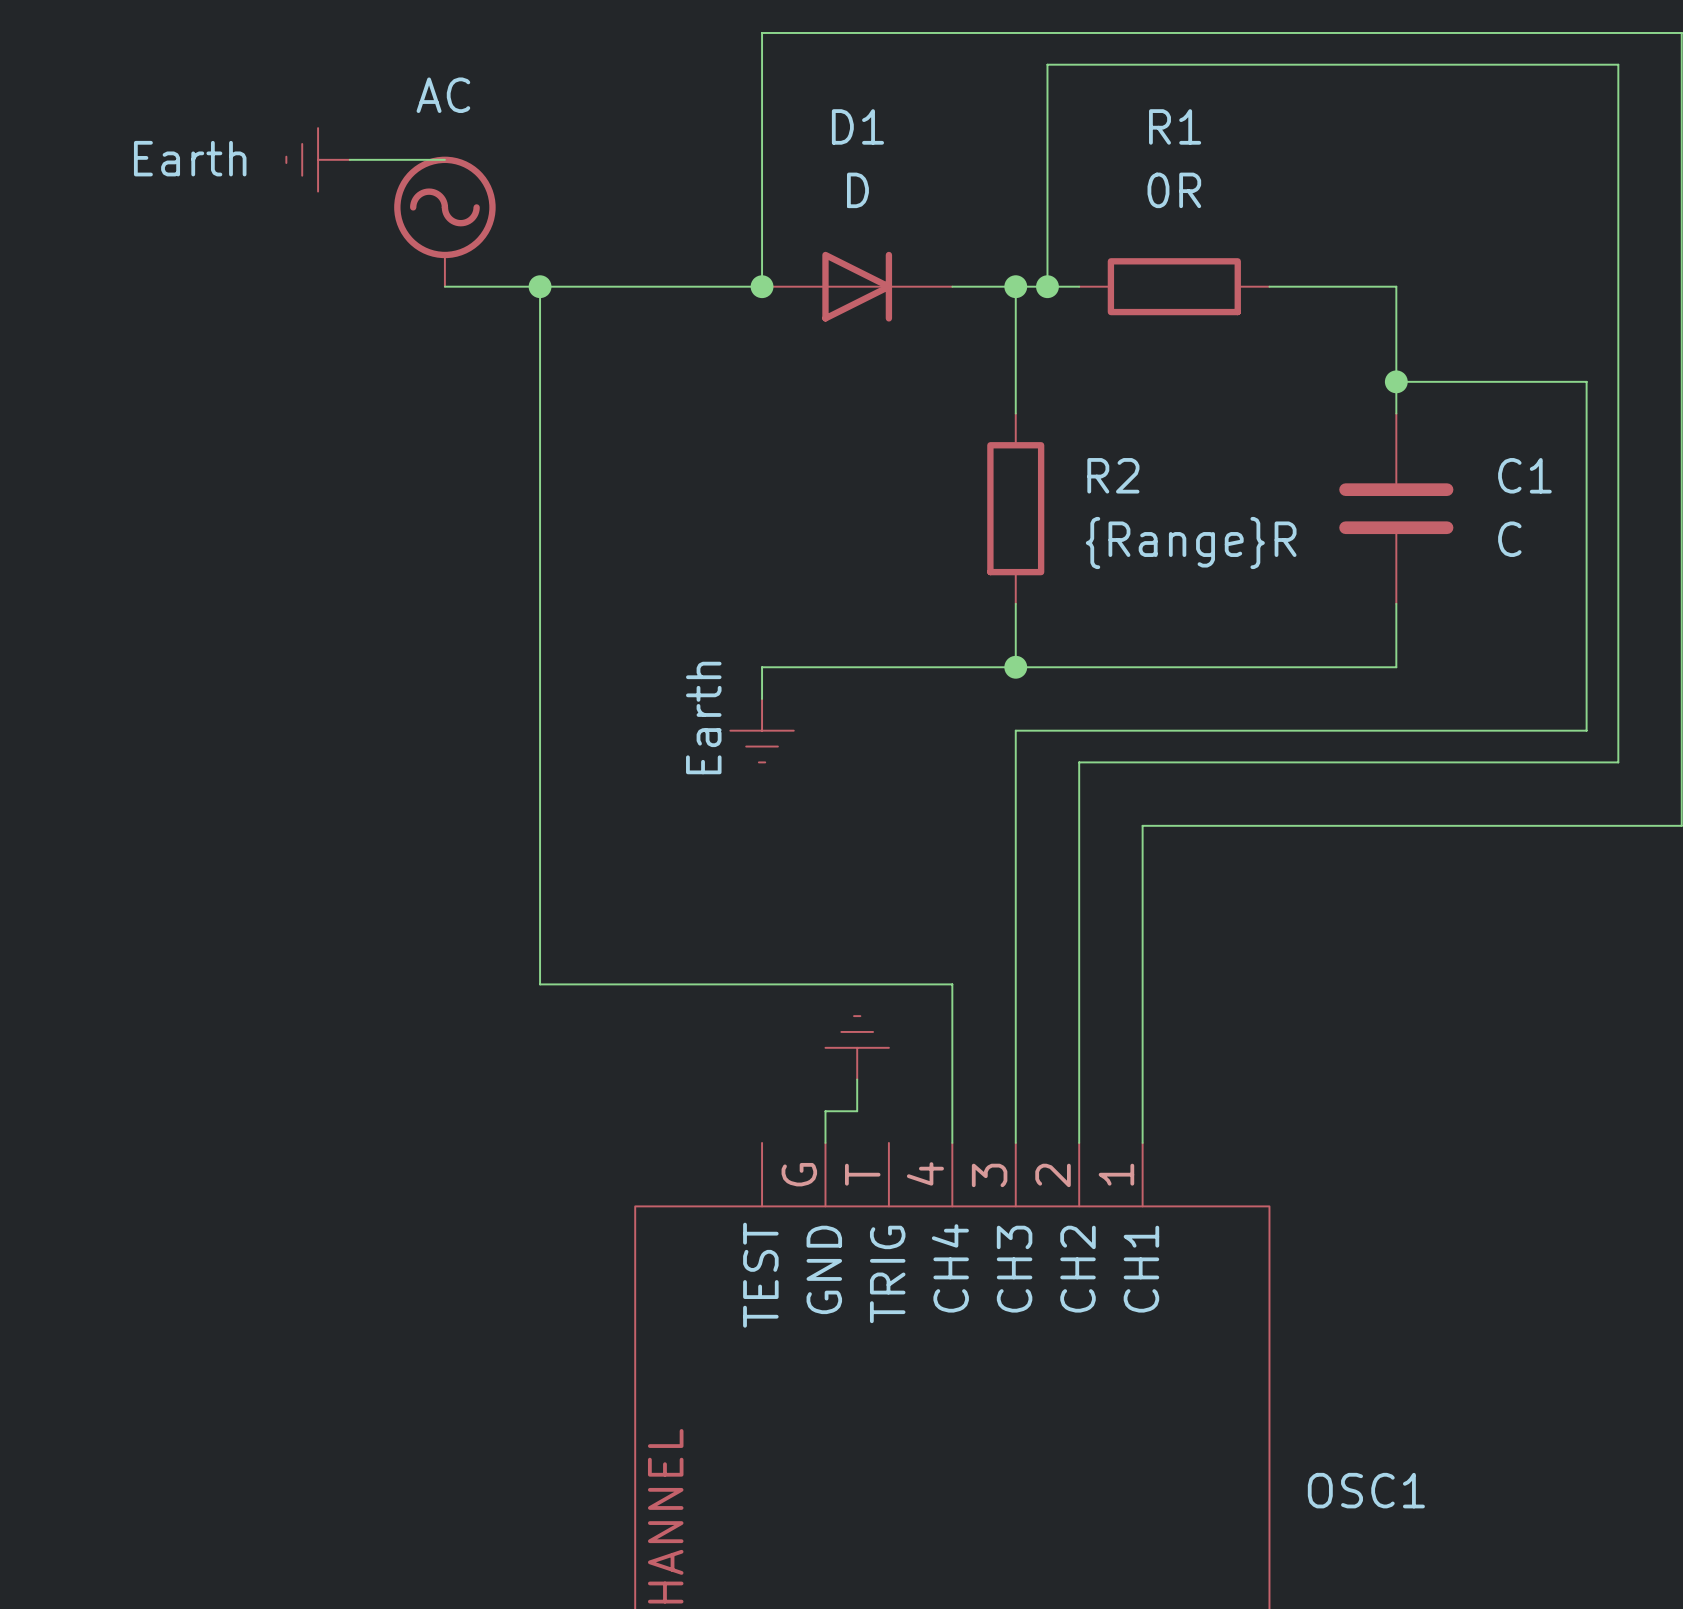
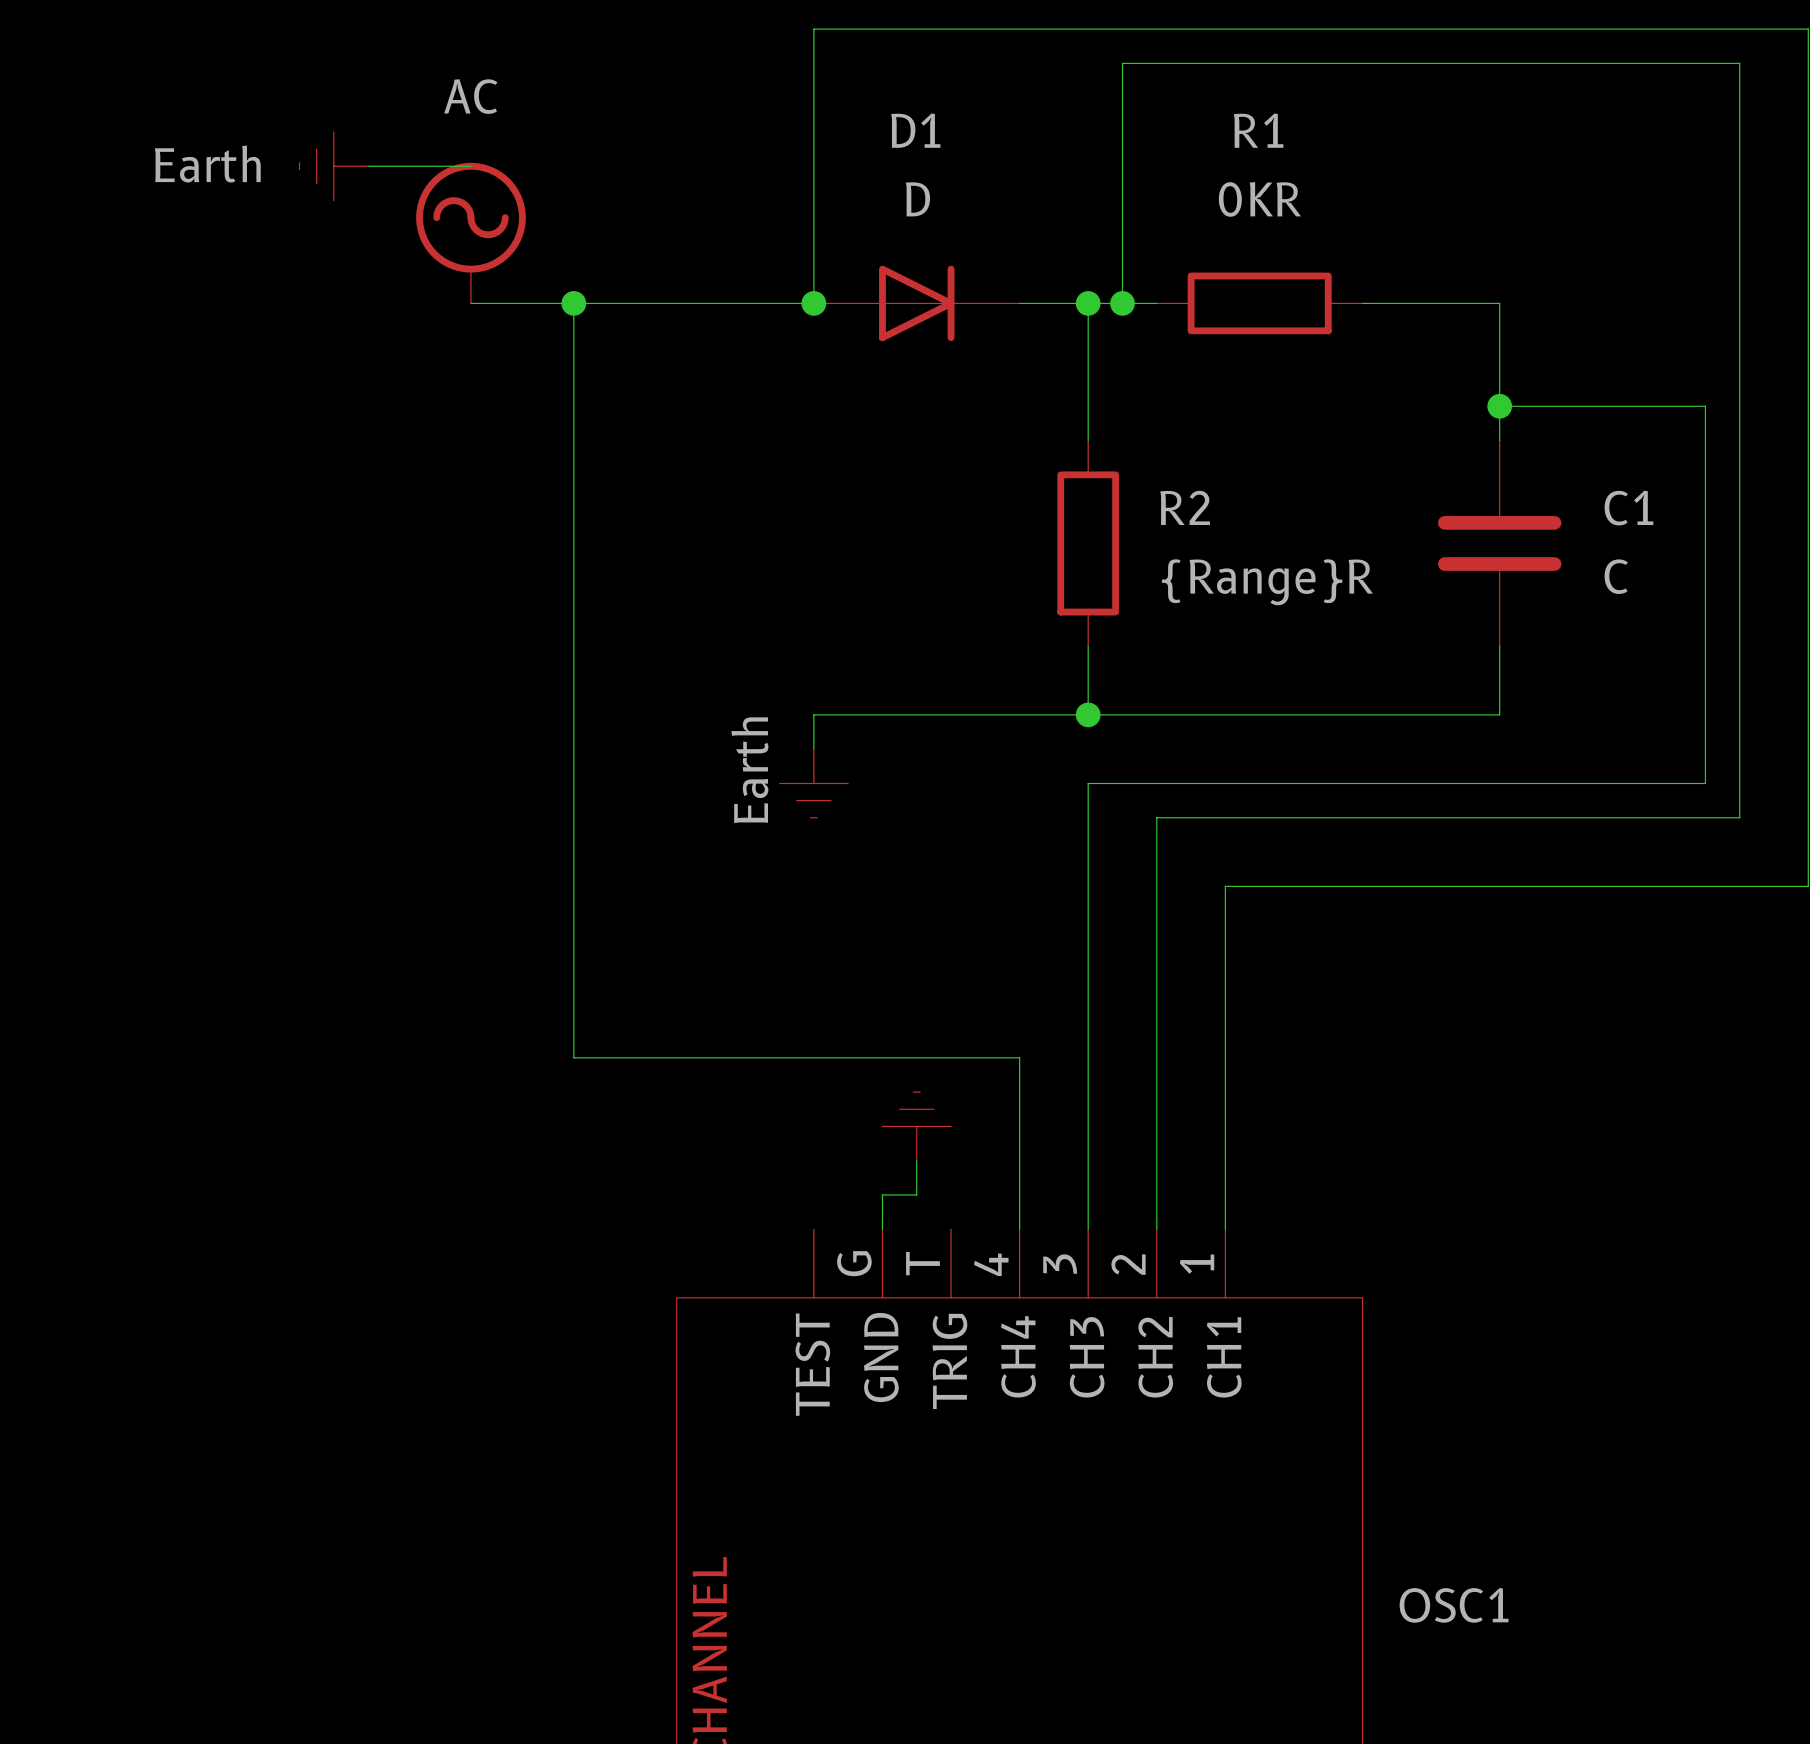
R1 value: 0R (1174, 190) -> 0KR (1259, 199)

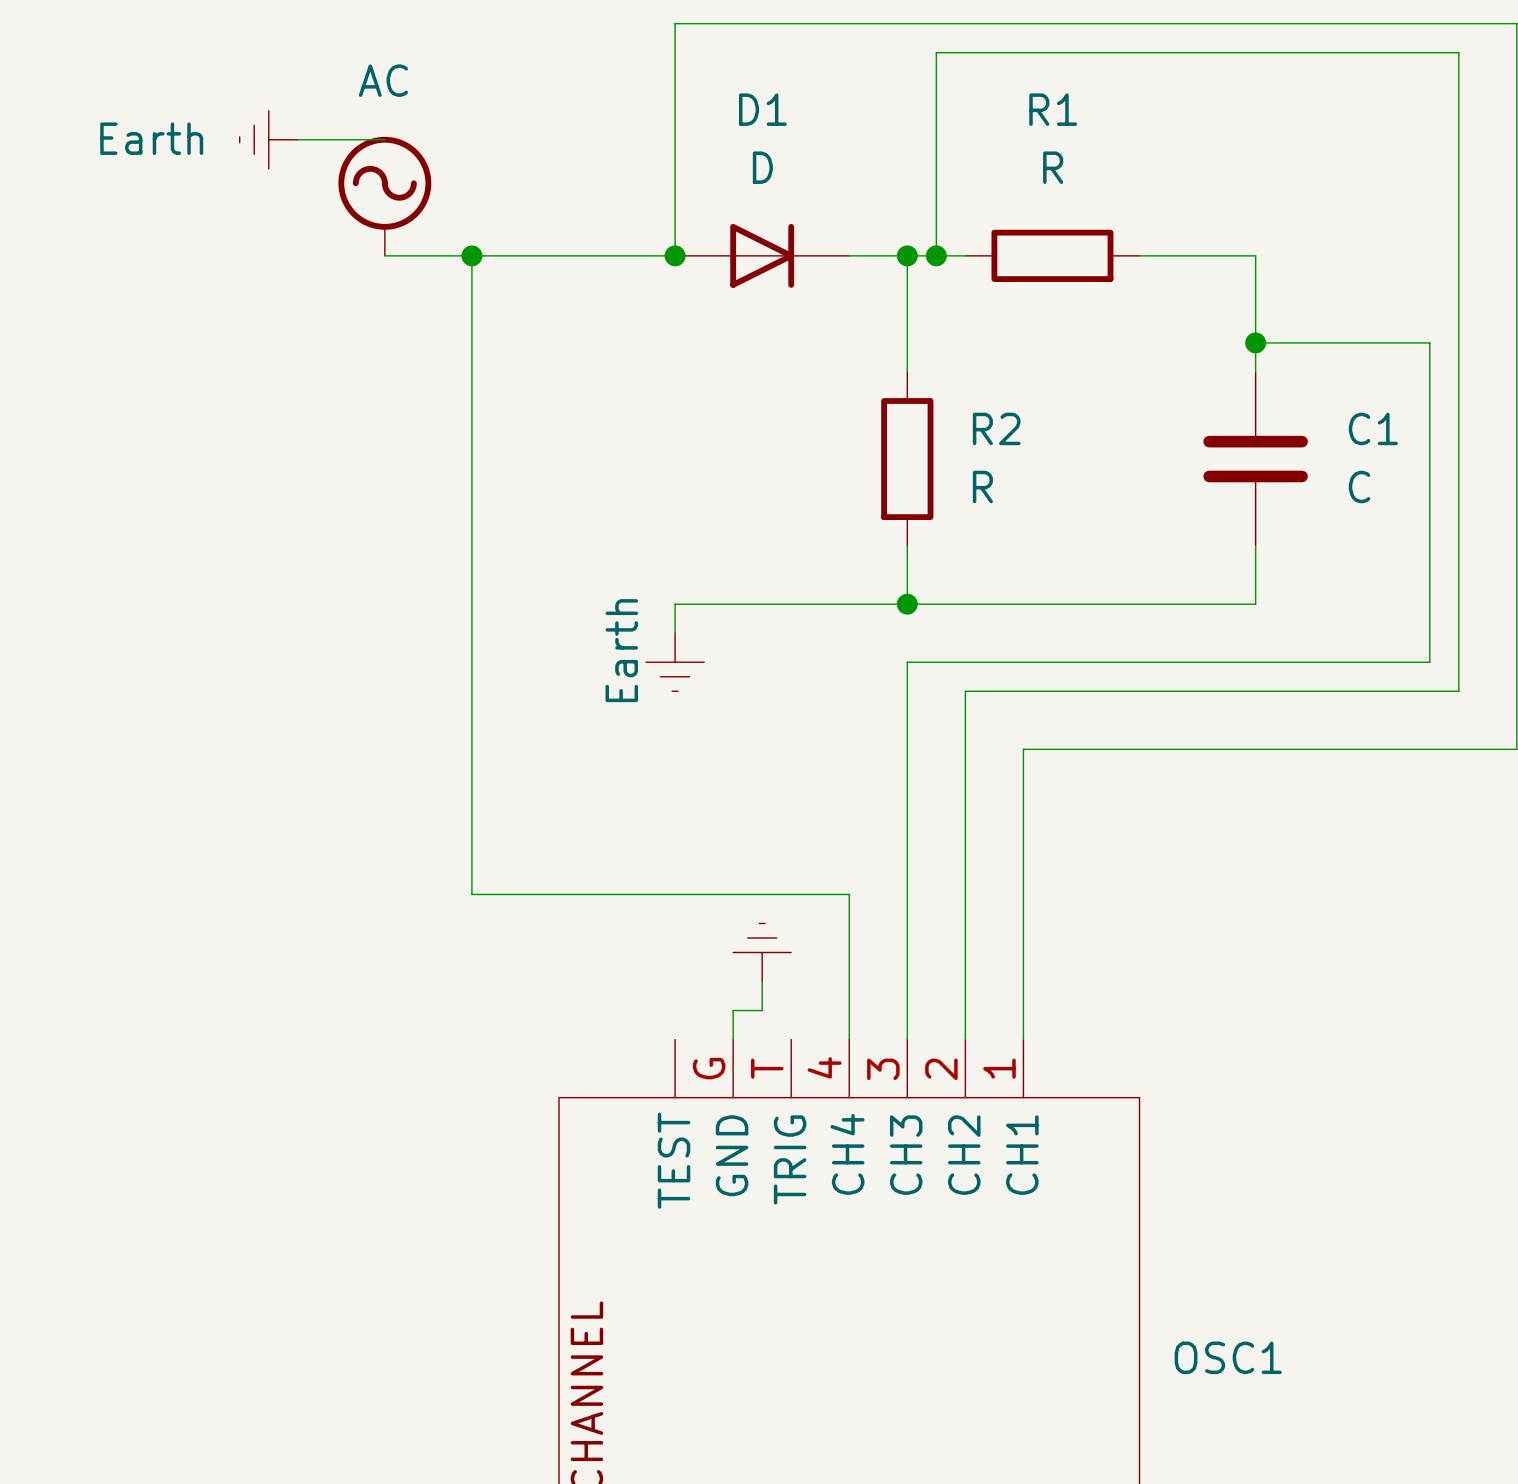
R1 value: 0KR (1259, 199) -> R (1053, 167)
R2 value: {Range}R (1267, 582) -> R (982, 487)

